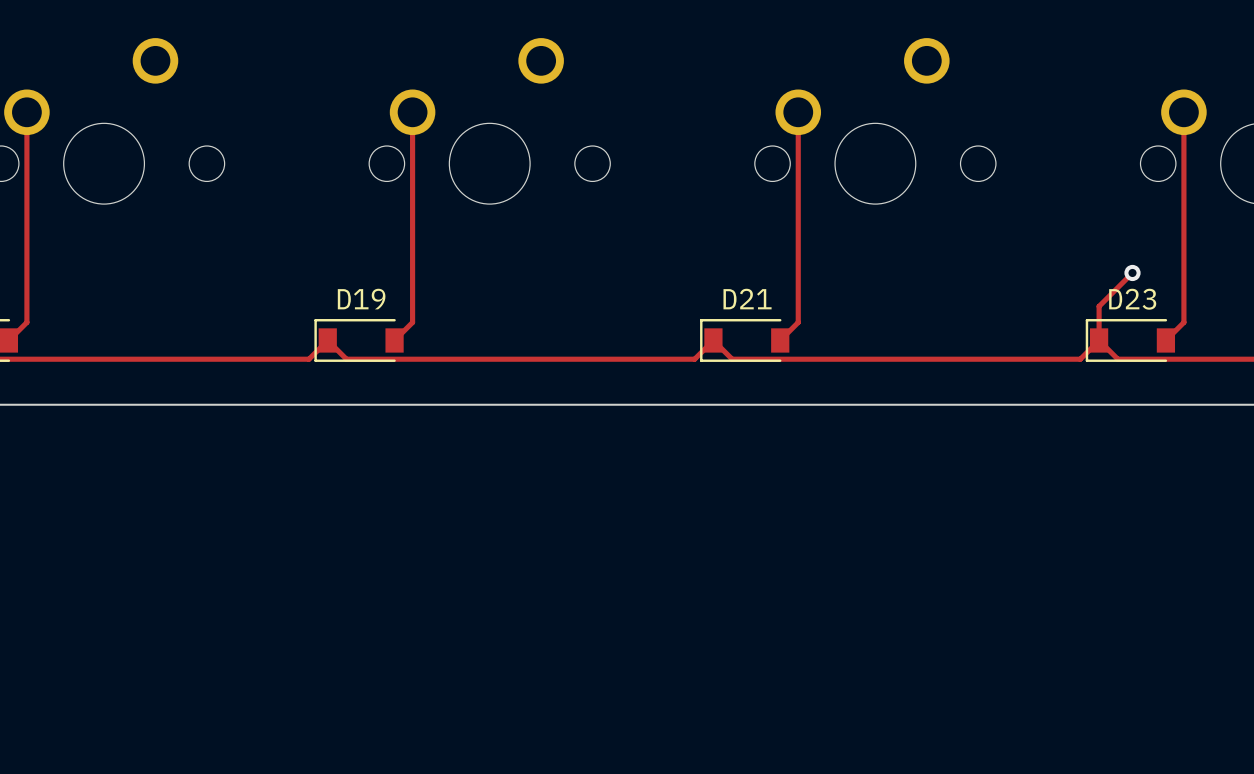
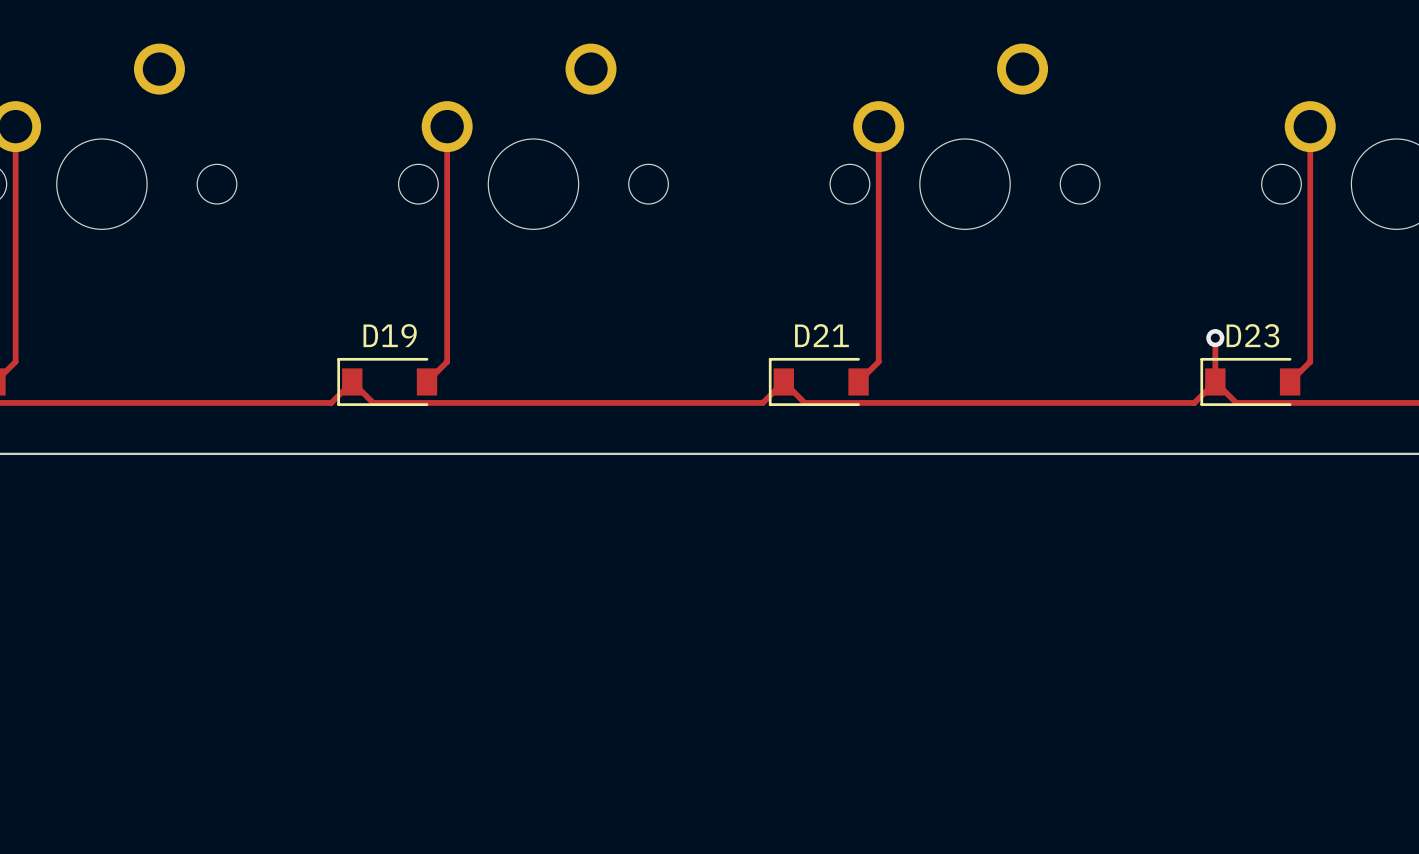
track: (1132, 272) (1099, 306) -> none
via position: (1132, 272) -> (1215, 338)

